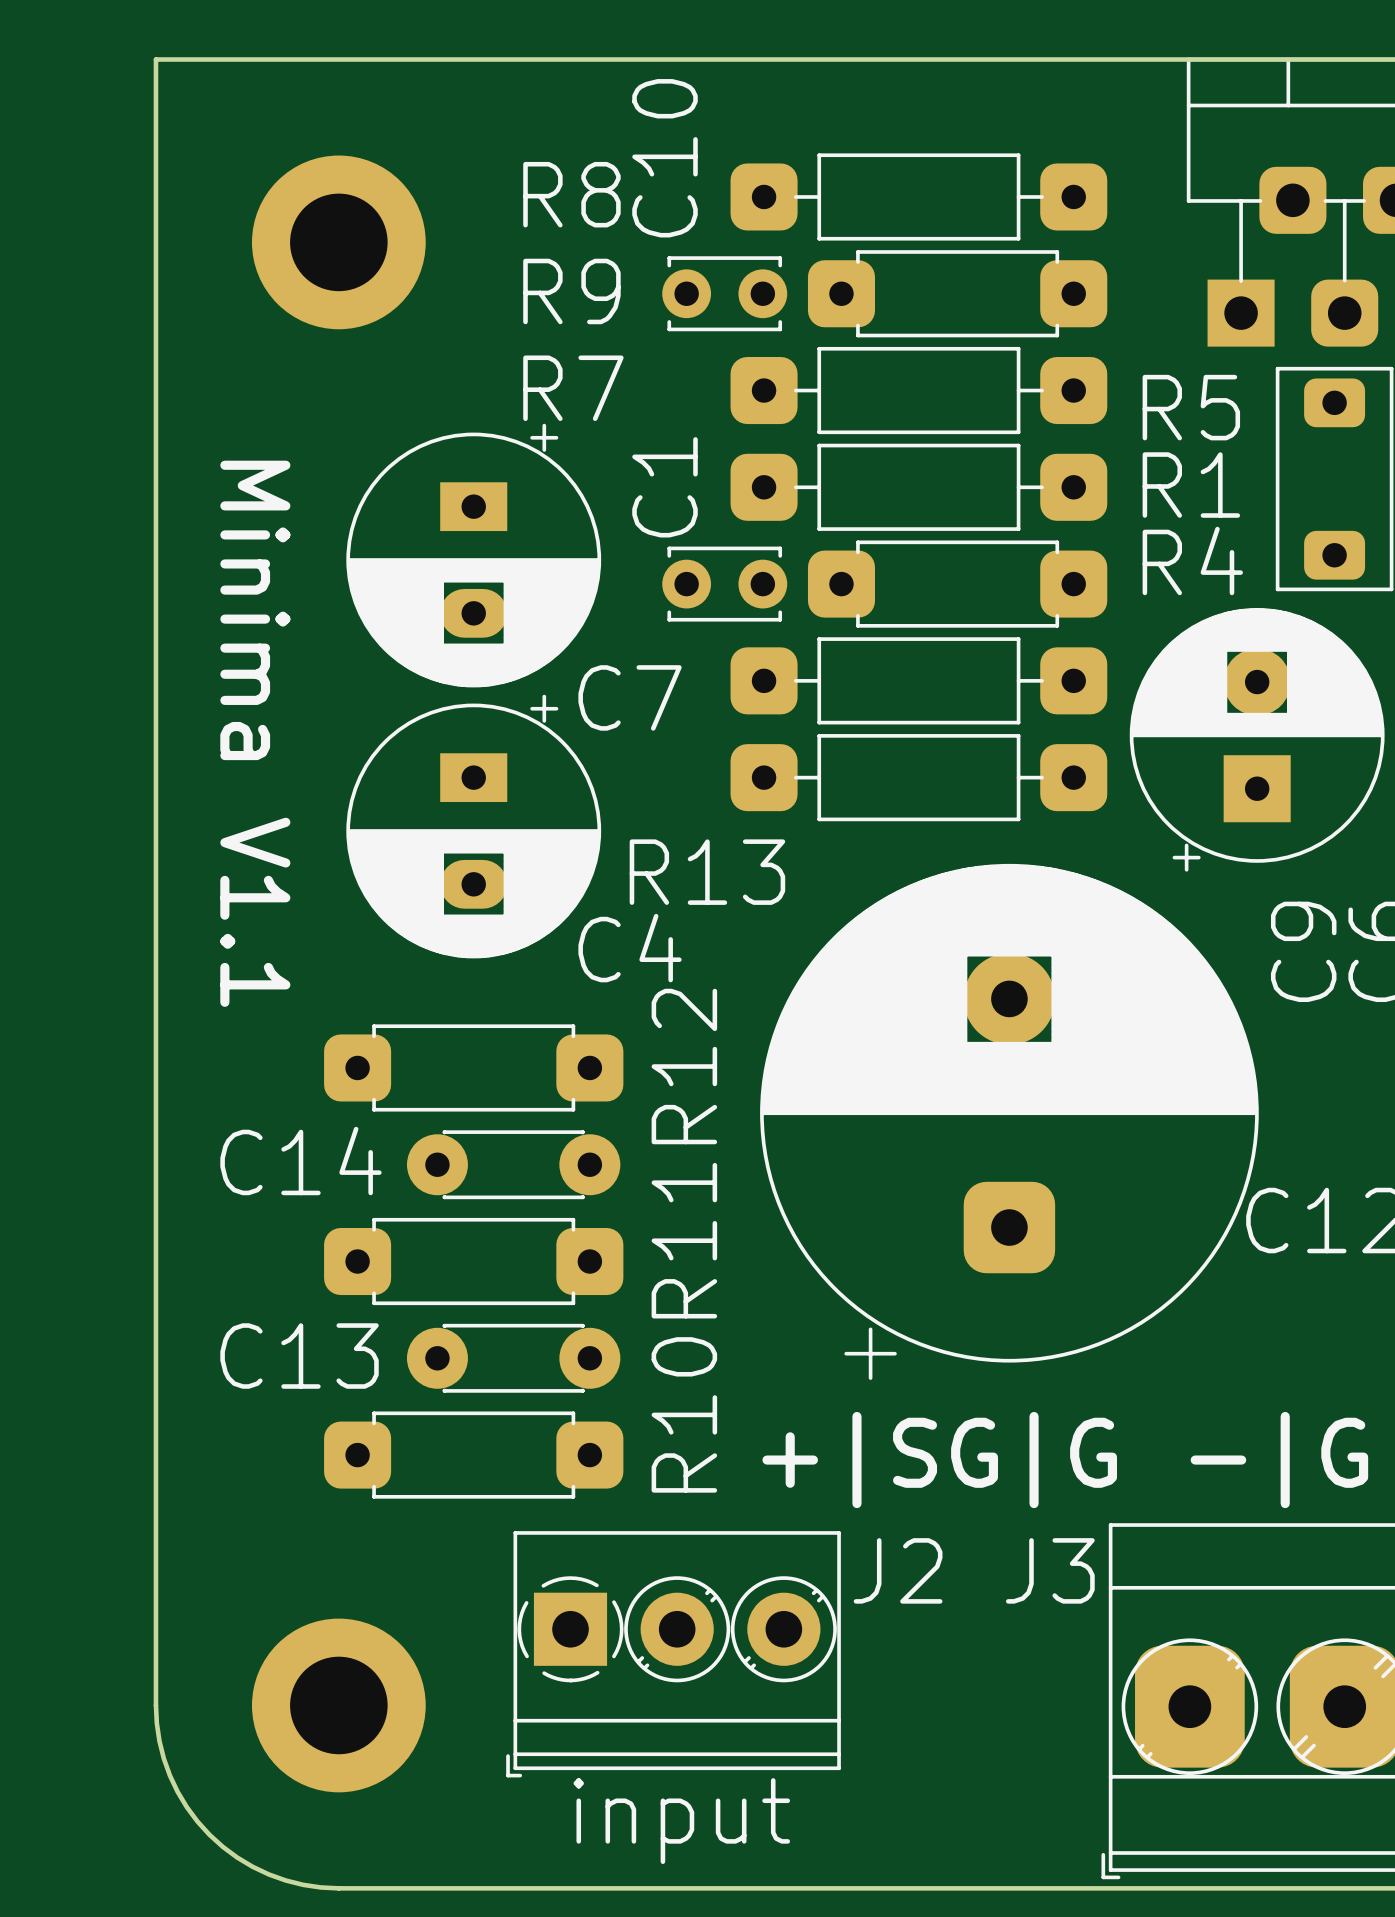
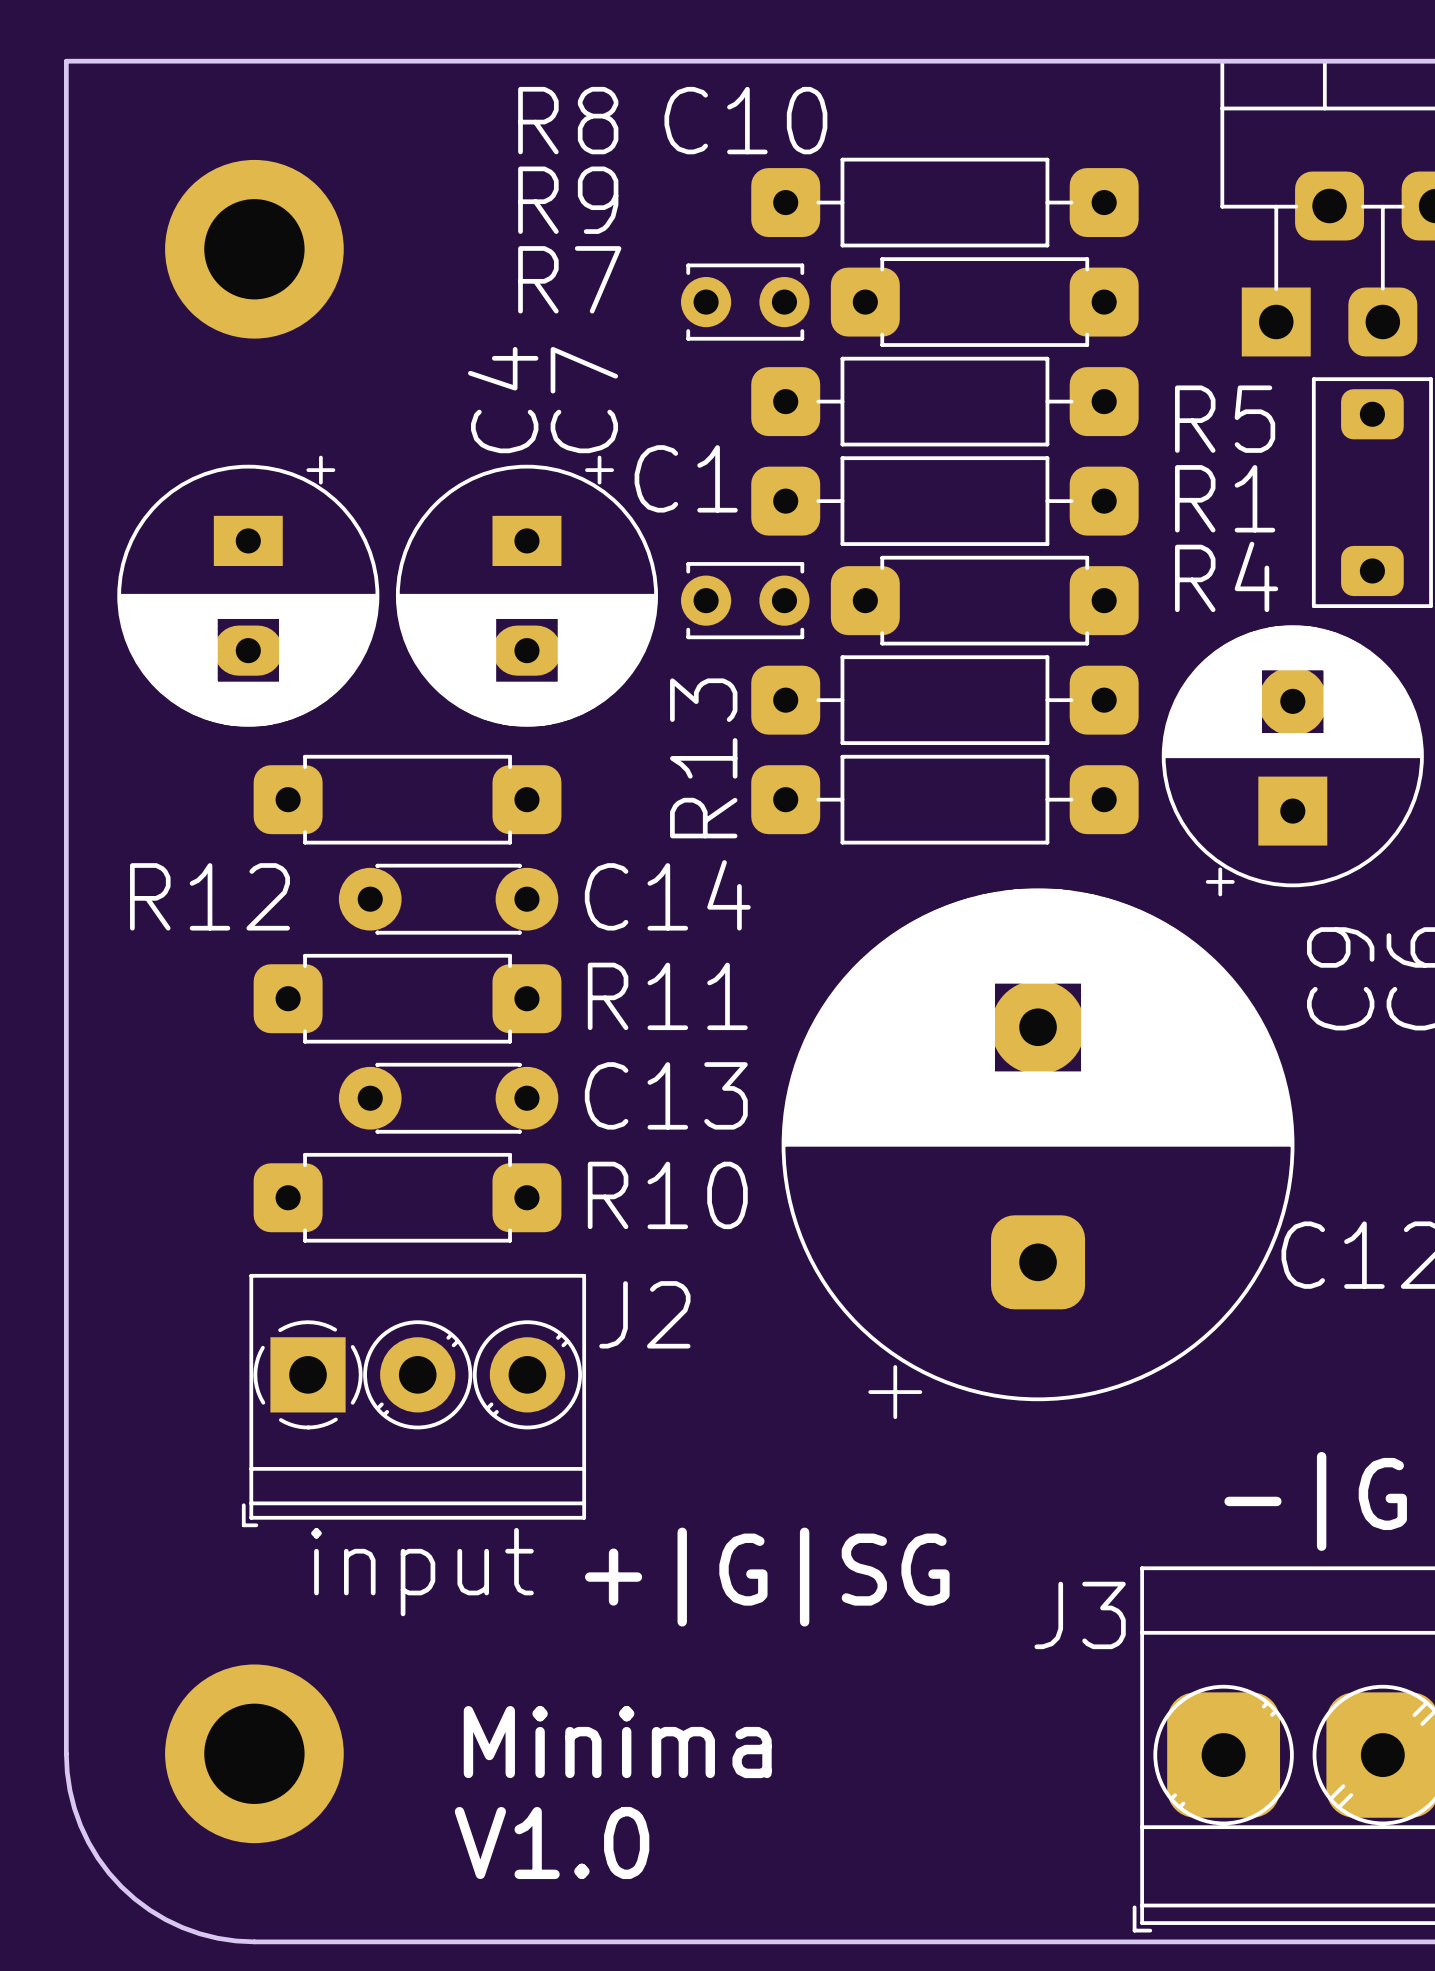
board edge: (155, 59) (156, 1723) (163, 1758) (169, 1775) (186, 1807) (209, 1834) (237, 1857) (268, 1874) (303, 1884) (338, 1888) -> (160, 61) (66, 61) (67, 1772) (74, 1808) (80, 1825) (98, 1858) (121, 1886) (149, 1910) (182, 1927) (217, 1938) (254, 1941) (348, 1941)
C10 name rotation: 0° (665, 158) -> 90° clockwise (745, 120)
R8 name position: R8 (571, 194) -> R8 (568, 120)
part position: (338, 242) -> (254, 249)
R9 name position: R9 (571, 291) -> R9 (568, 200)
R7 name position: R7 (573, 388) -> R7 (569, 279)
C1 name rotation: 0° (665, 487) -> 90° clockwise (686, 478)
C7 position: (473, 555) -> (526, 591)
C7 name rotation: 0° (630, 697) -> 90° counterclockwise (584, 400)
C7 name position: C7 (630, 697) -> C7 (584, 400)
text: Minima V1.1 (255, 733) -> none
C4 position: (473, 826) -> (248, 591)
R13 name rotation: 0° (707, 872) -> 90° counterclockwise (703, 758)
C4 name rotation: 0° (630, 948) -> 90° counterclockwise (503, 400)
C4 name position: C4 (630, 948) -> C4 (503, 400)
R12 name rotation: 0° (684, 1066) -> 90° clockwise (209, 896)
R12 name position: R12 (684, 1066) -> R12 (209, 896)
R12 position: (473, 1067) -> (407, 799)
C14 name position: C14 (300, 1161) -> C14 (667, 895)
C14 position: (513, 1164) -> (448, 899)
R11 name rotation: 0° (684, 1240) -> 90° clockwise (667, 996)
R11 position: (473, 1261) -> (407, 998)
C13 name position: C13 (299, 1356) -> C13 (666, 1095)
C13 position: (513, 1358) -> (448, 1098)
R10 name rotation: 0° (684, 1414) -> 90° clockwise (667, 1195)
R10 position: (473, 1455) -> (407, 1197)
text: +|SG|G (939, 1460) -> +|G|SG (767, 1577)
J2 position: (673, 1654) -> (413, 1400)
text: none -> Minima (617, 1742)
part position: (338, 1705) -> (254, 1753)
text: none -> V1.0 (552, 1842)

